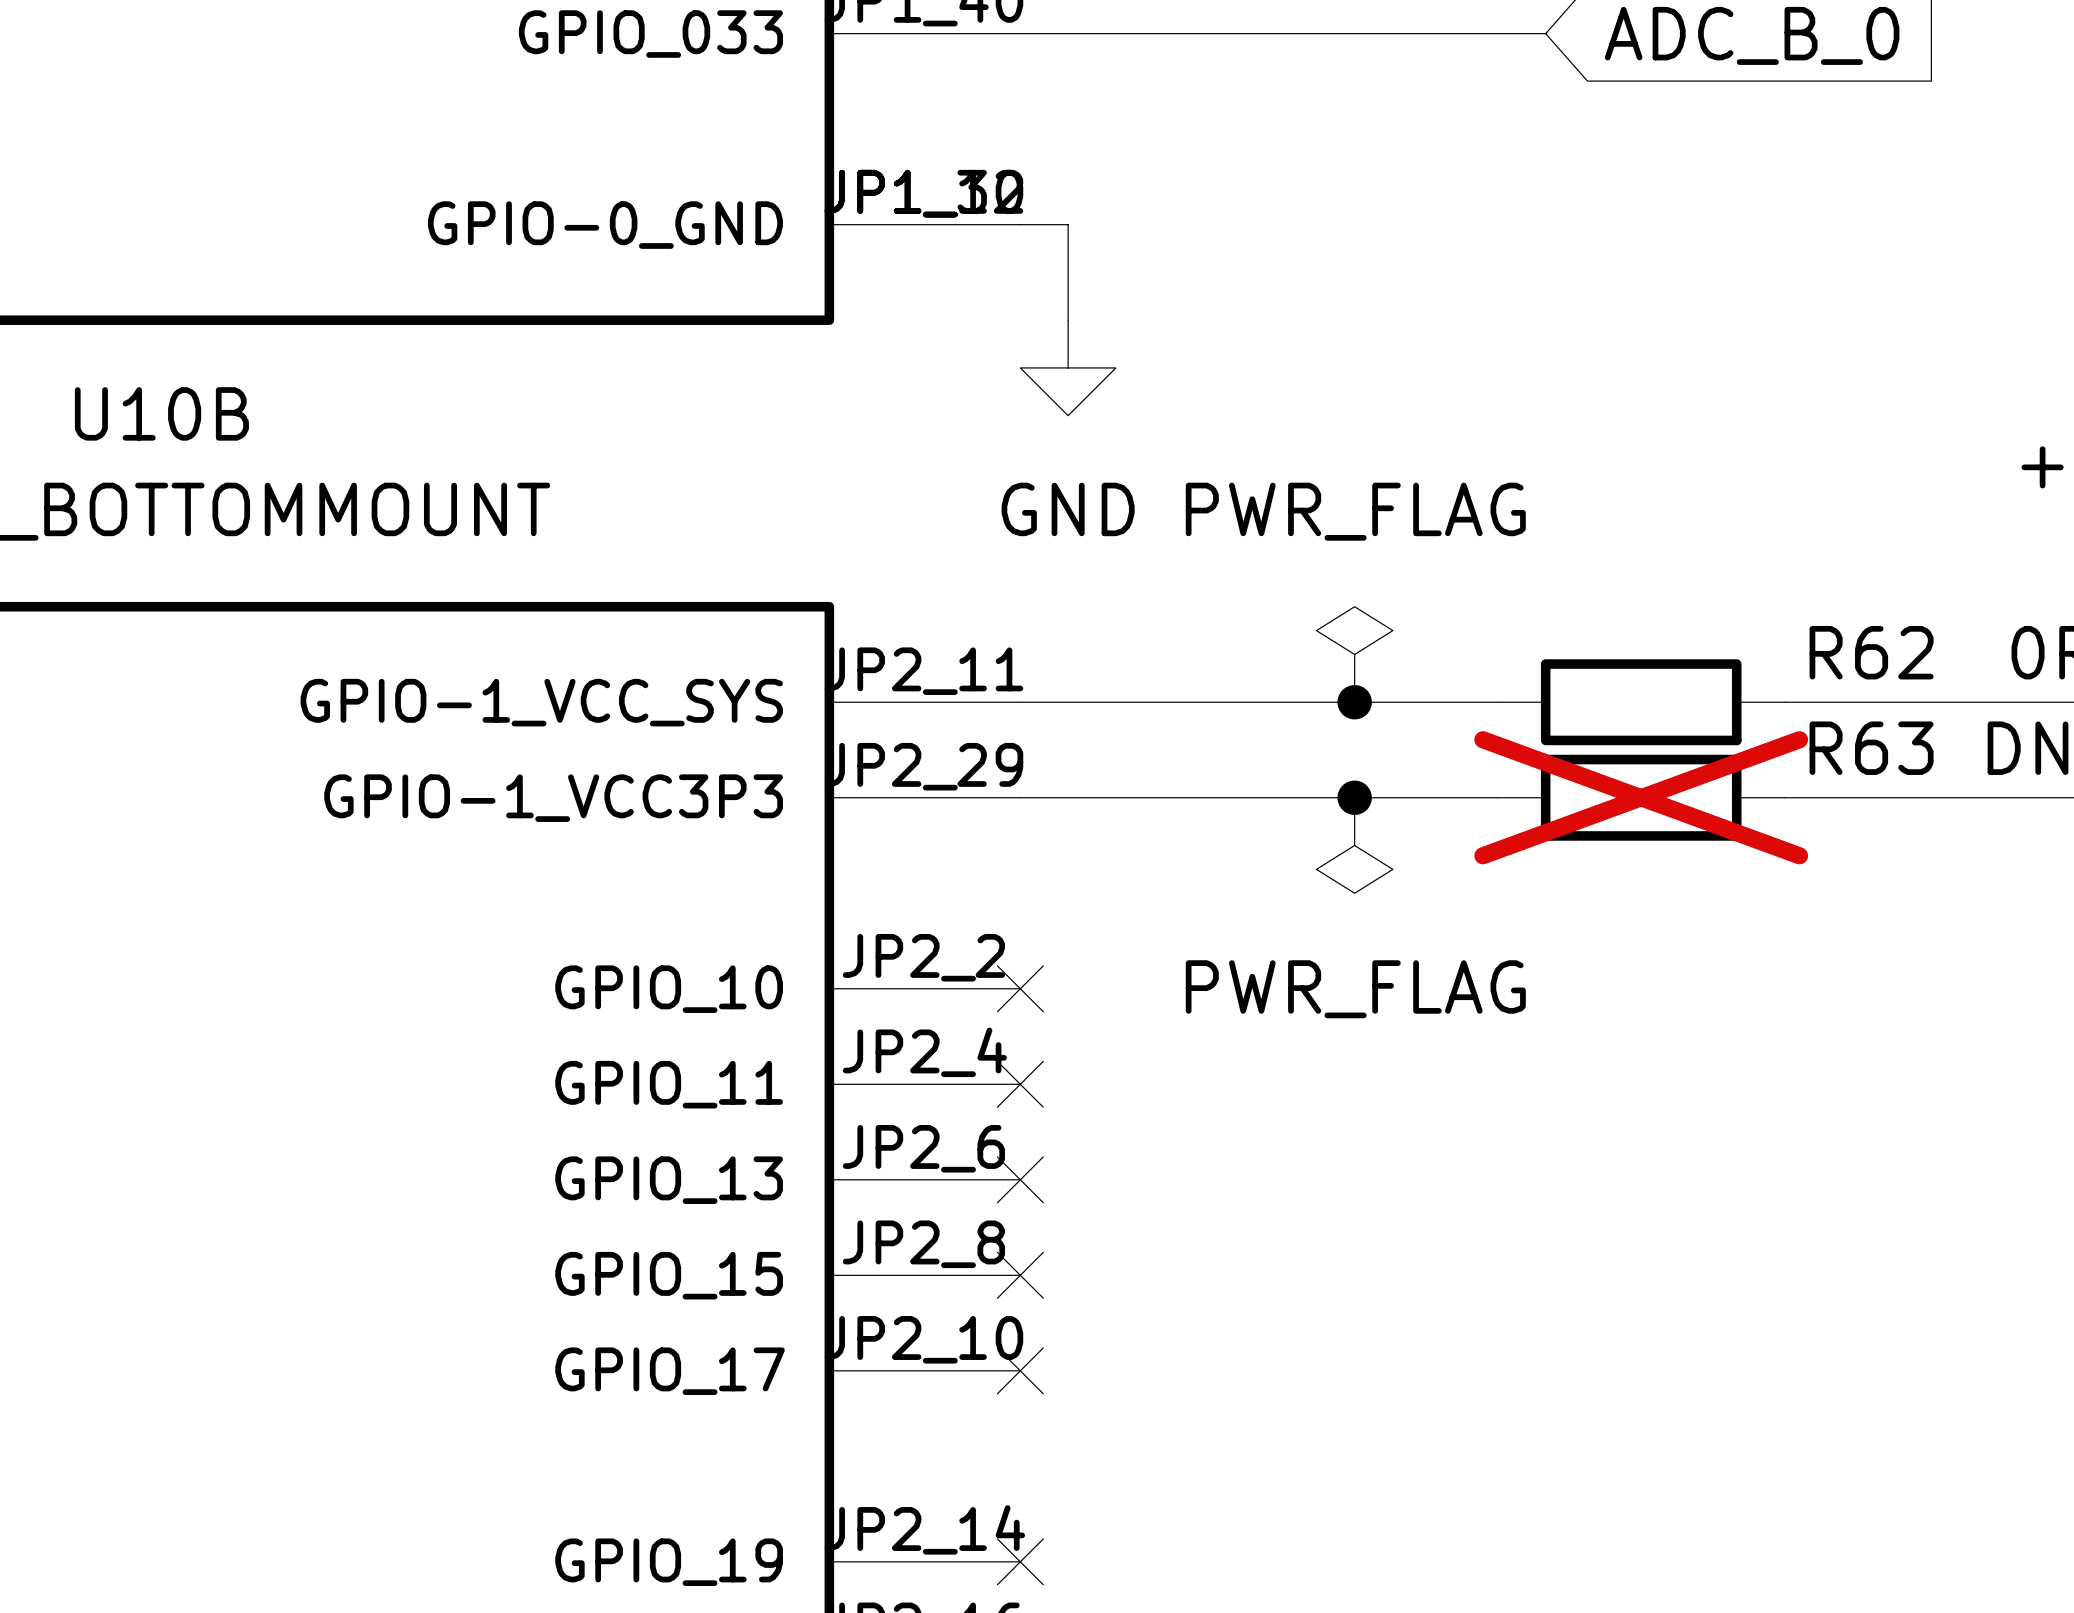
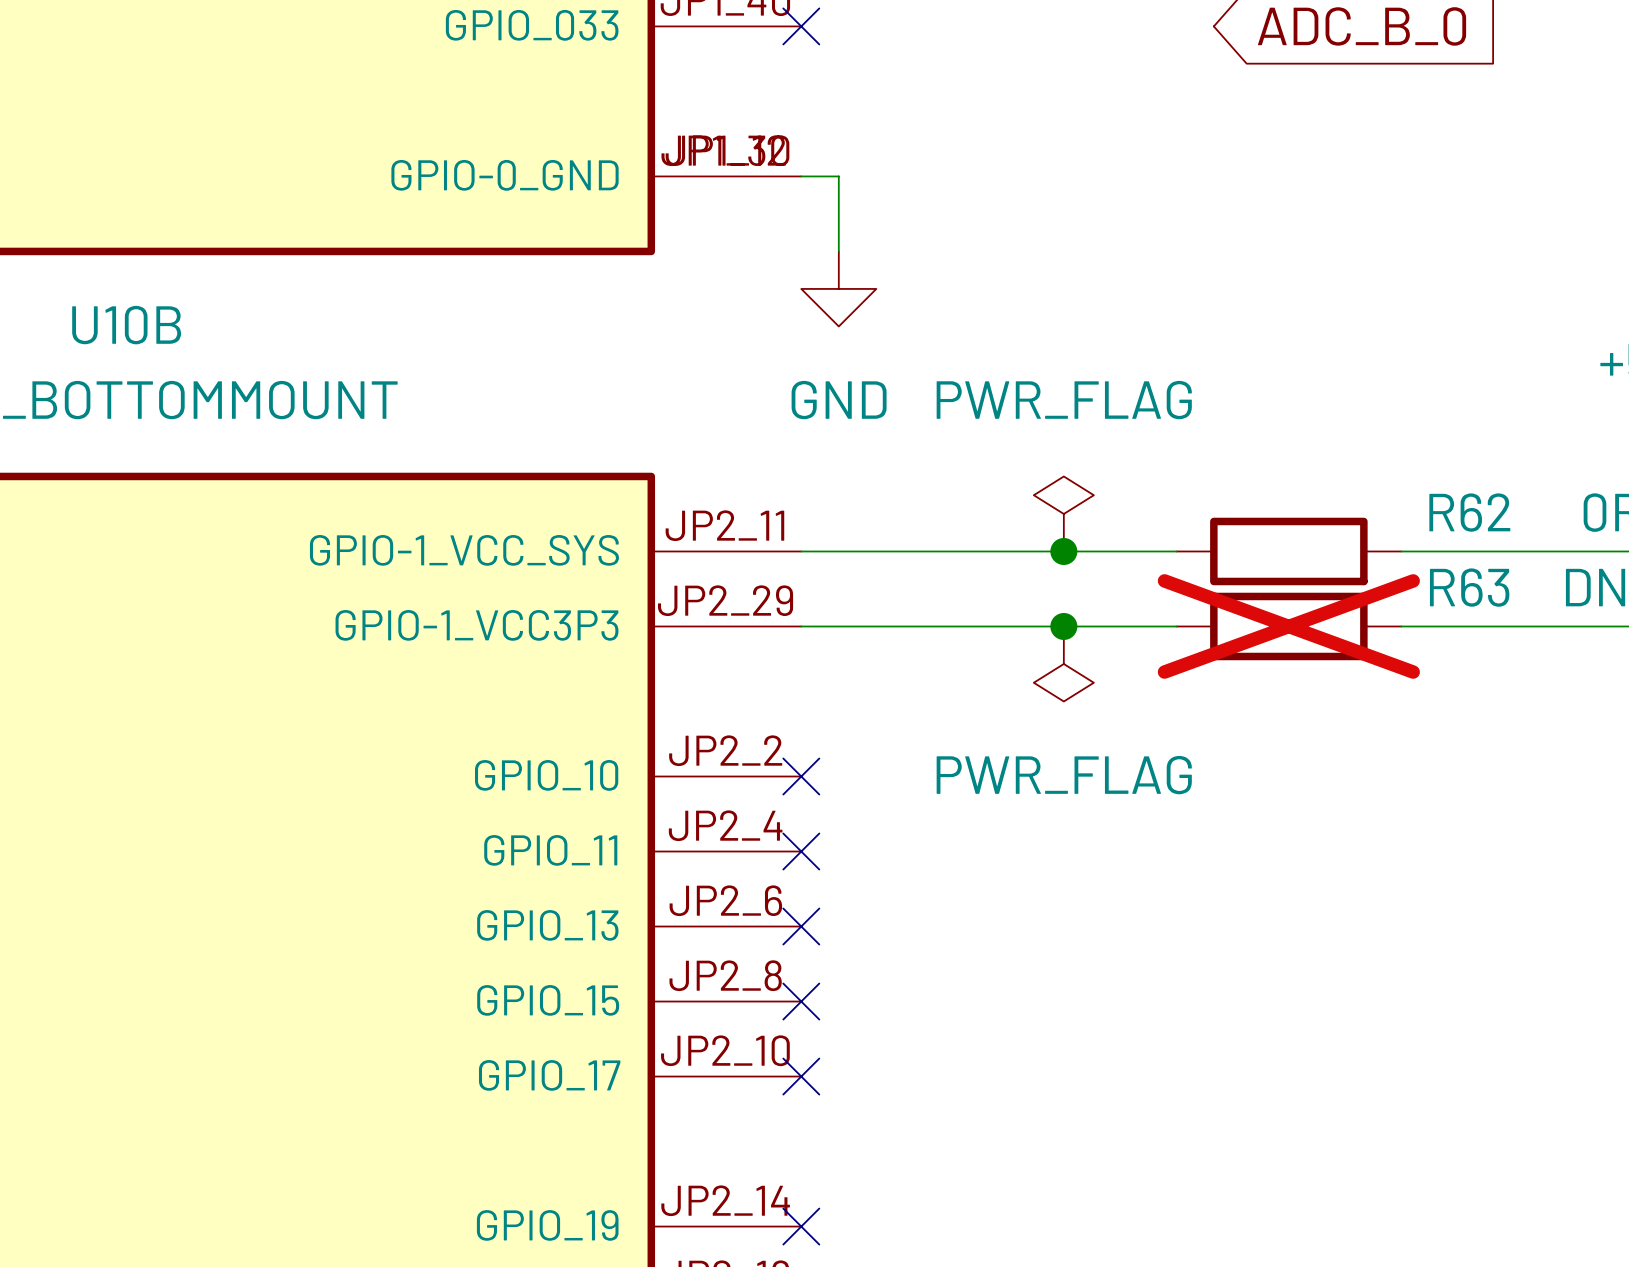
wire: (1020, 33) (1545, 33) -> none
no-connect mark: none -> (801, 26)

